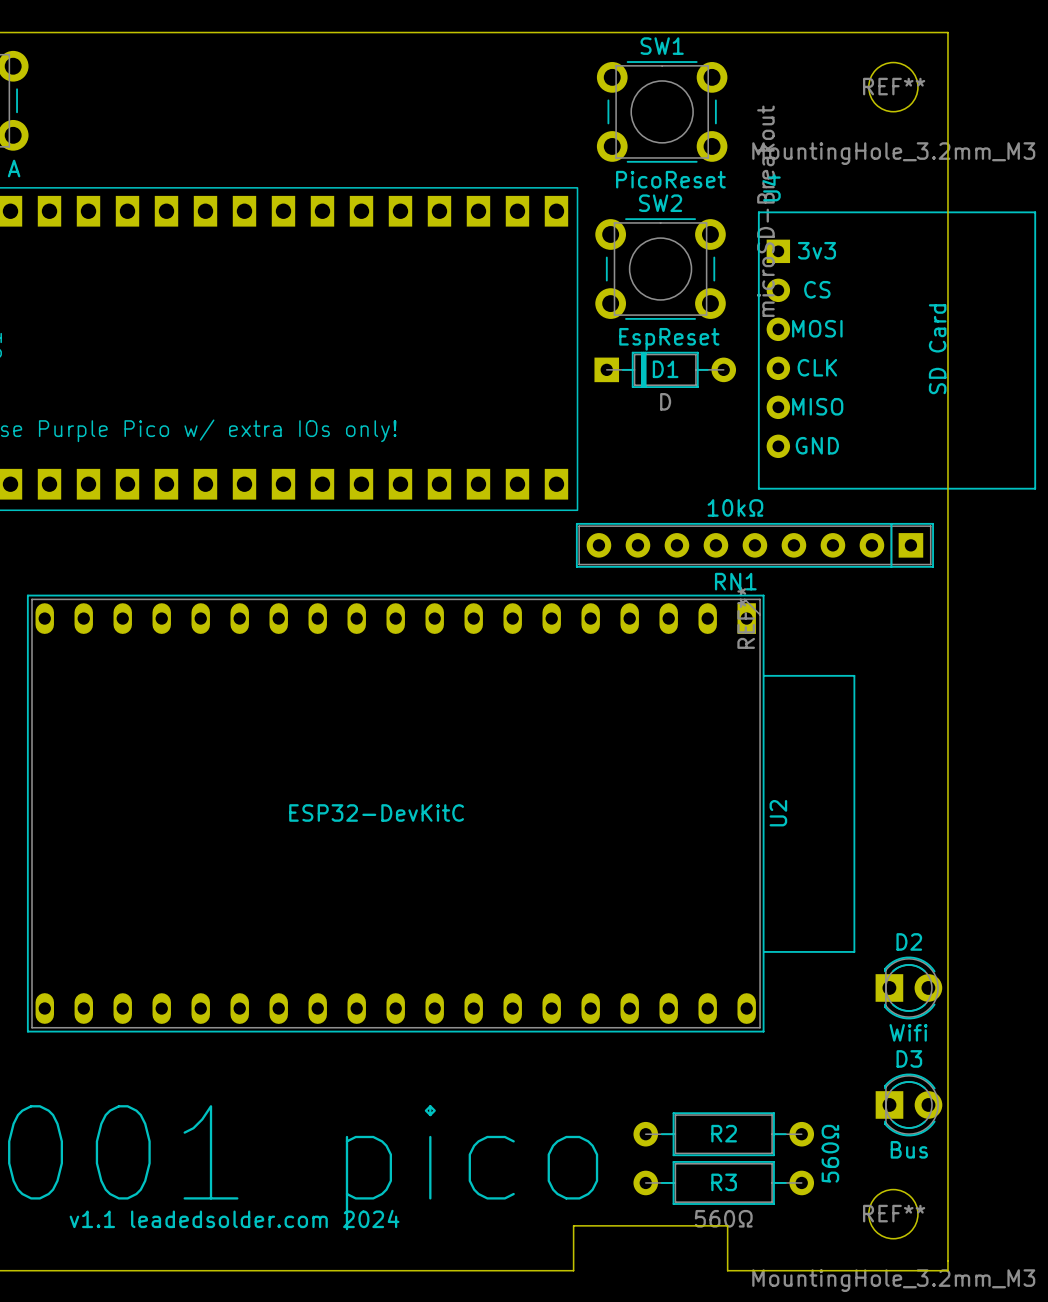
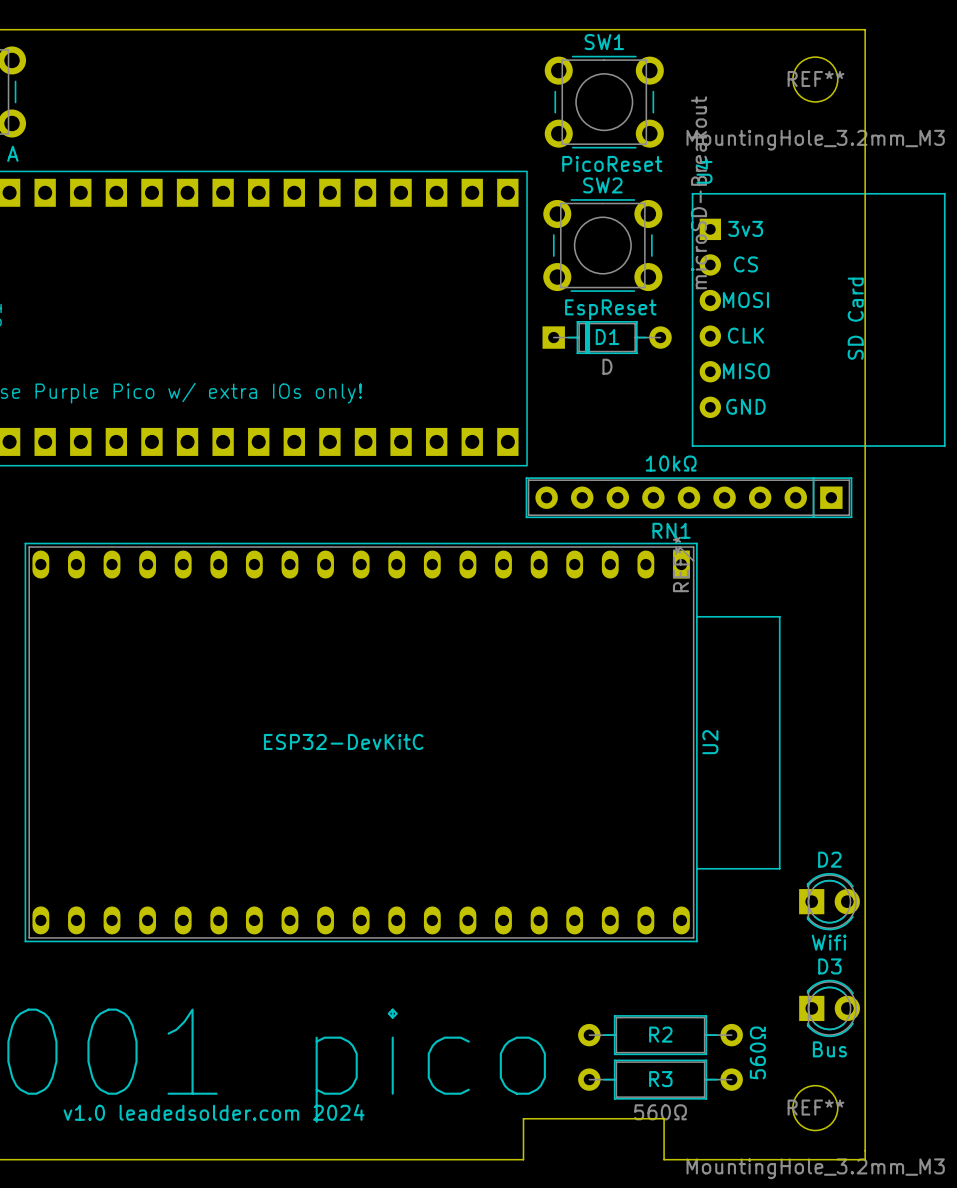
text: v1.1 leadedsolder.com 2024 (234, 1218) -> v1.0 leadedsolder.com 2024 (214, 1112)

